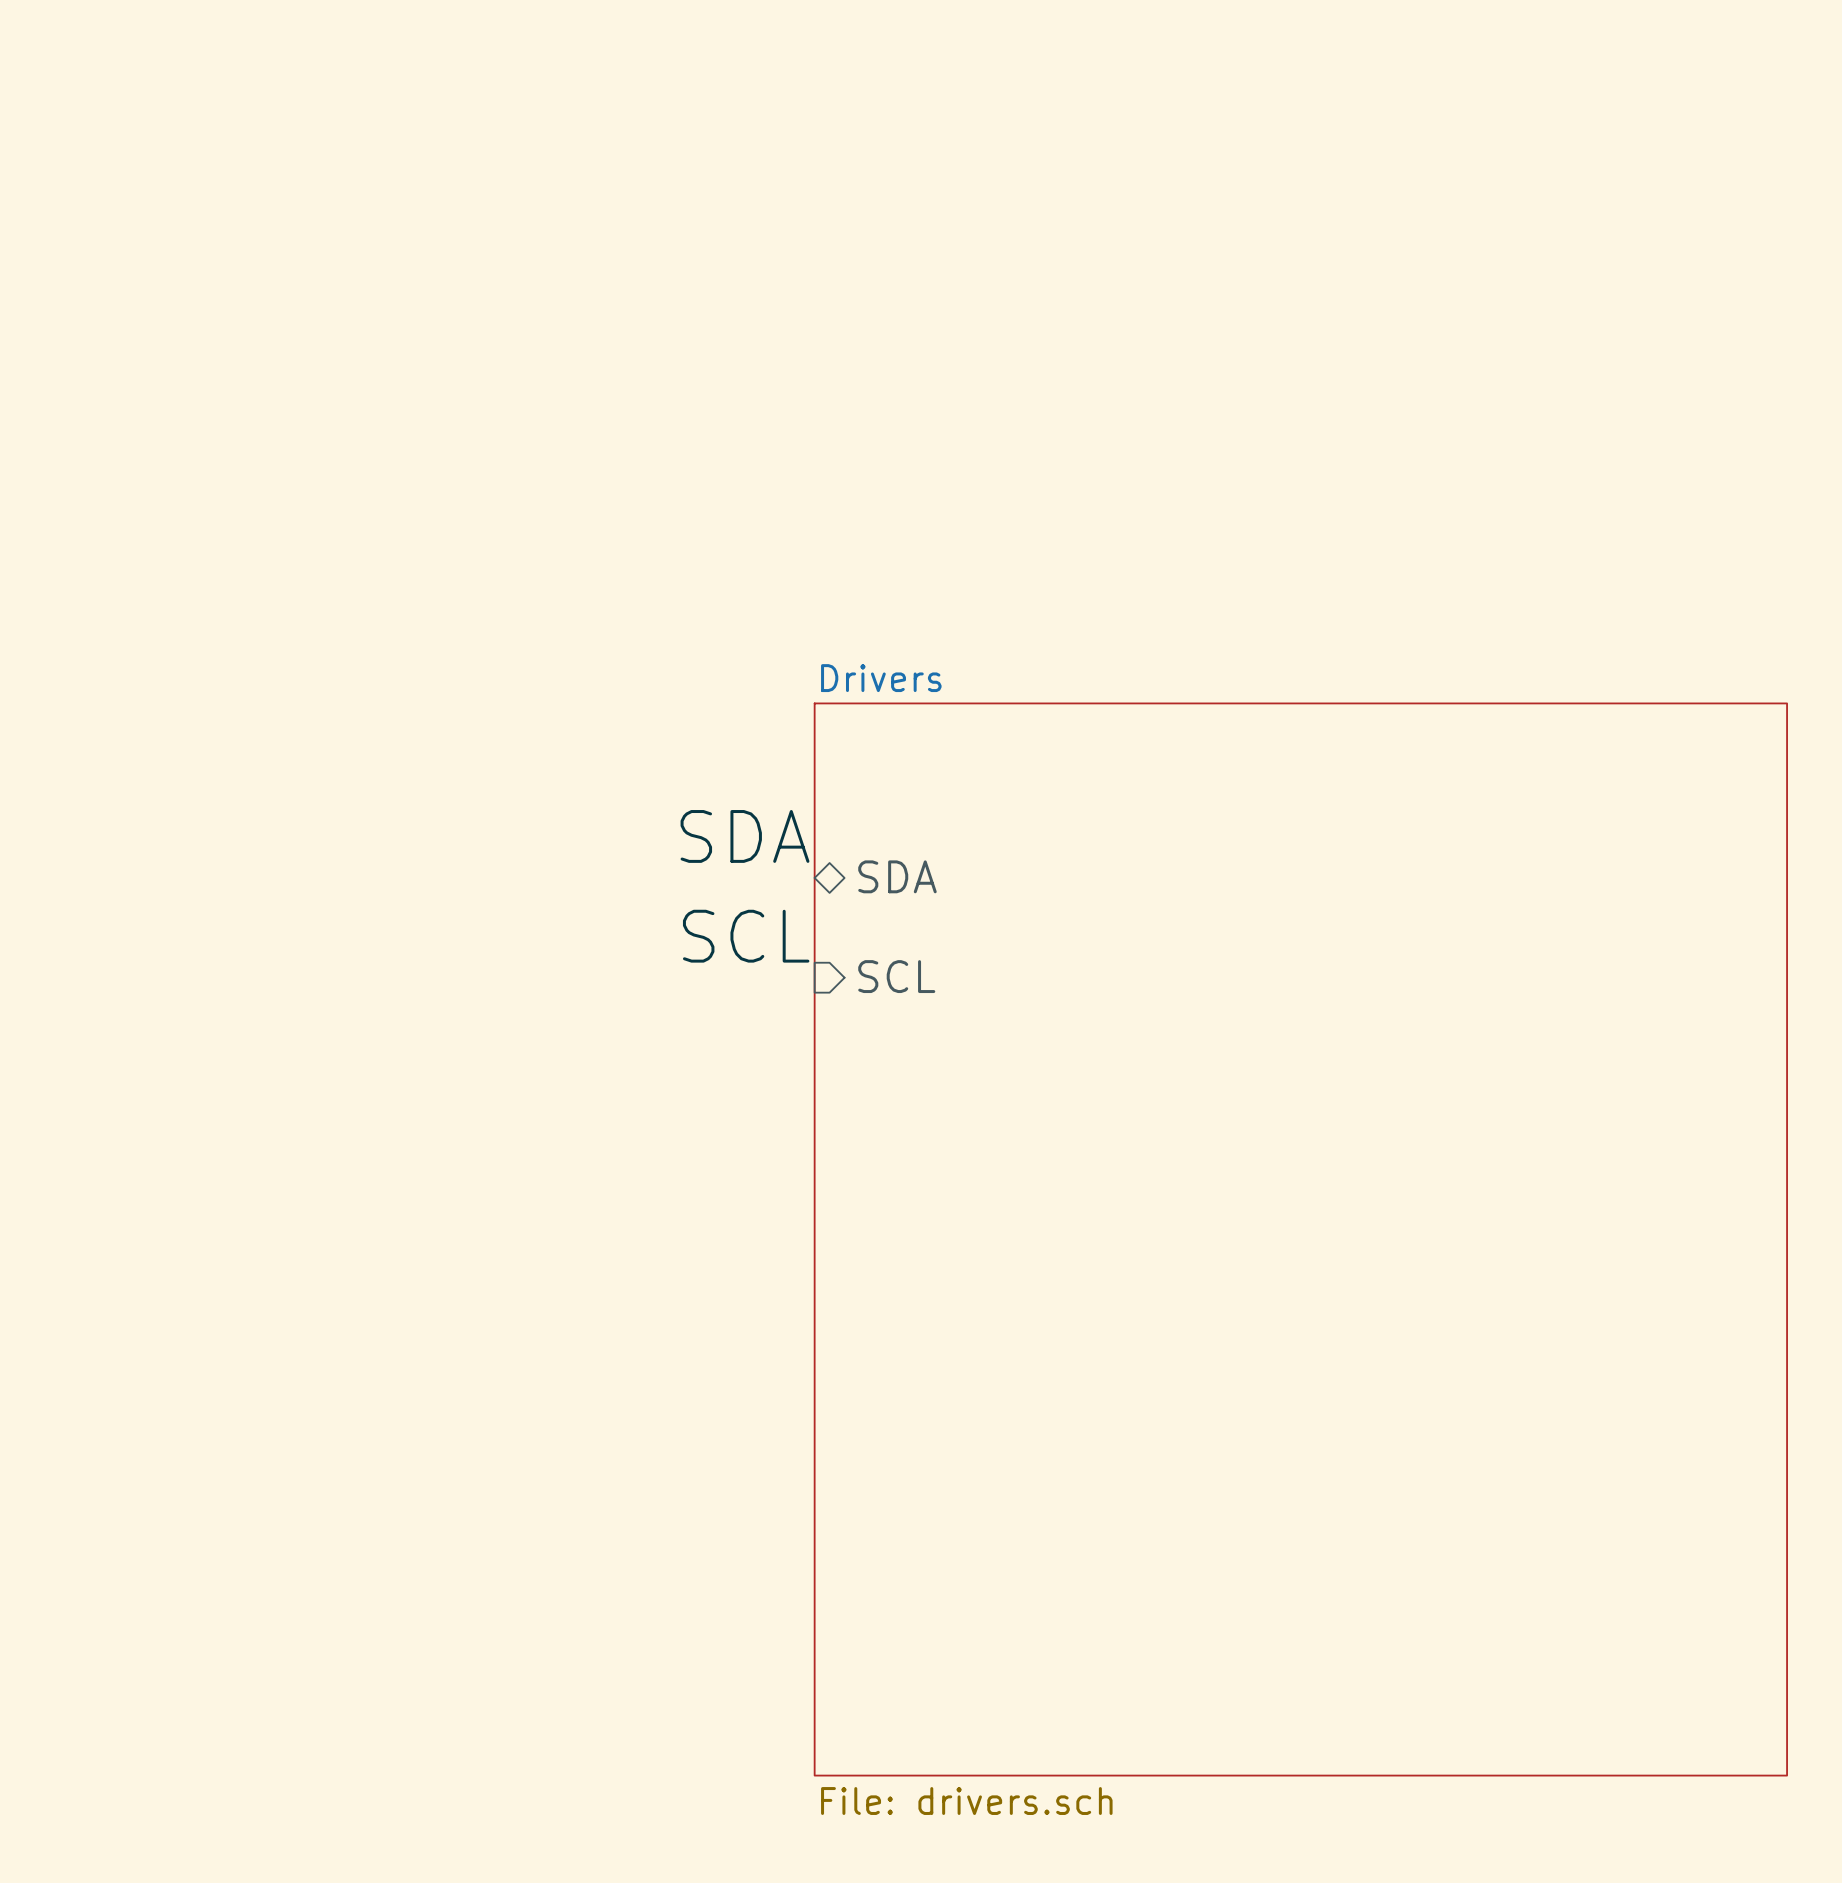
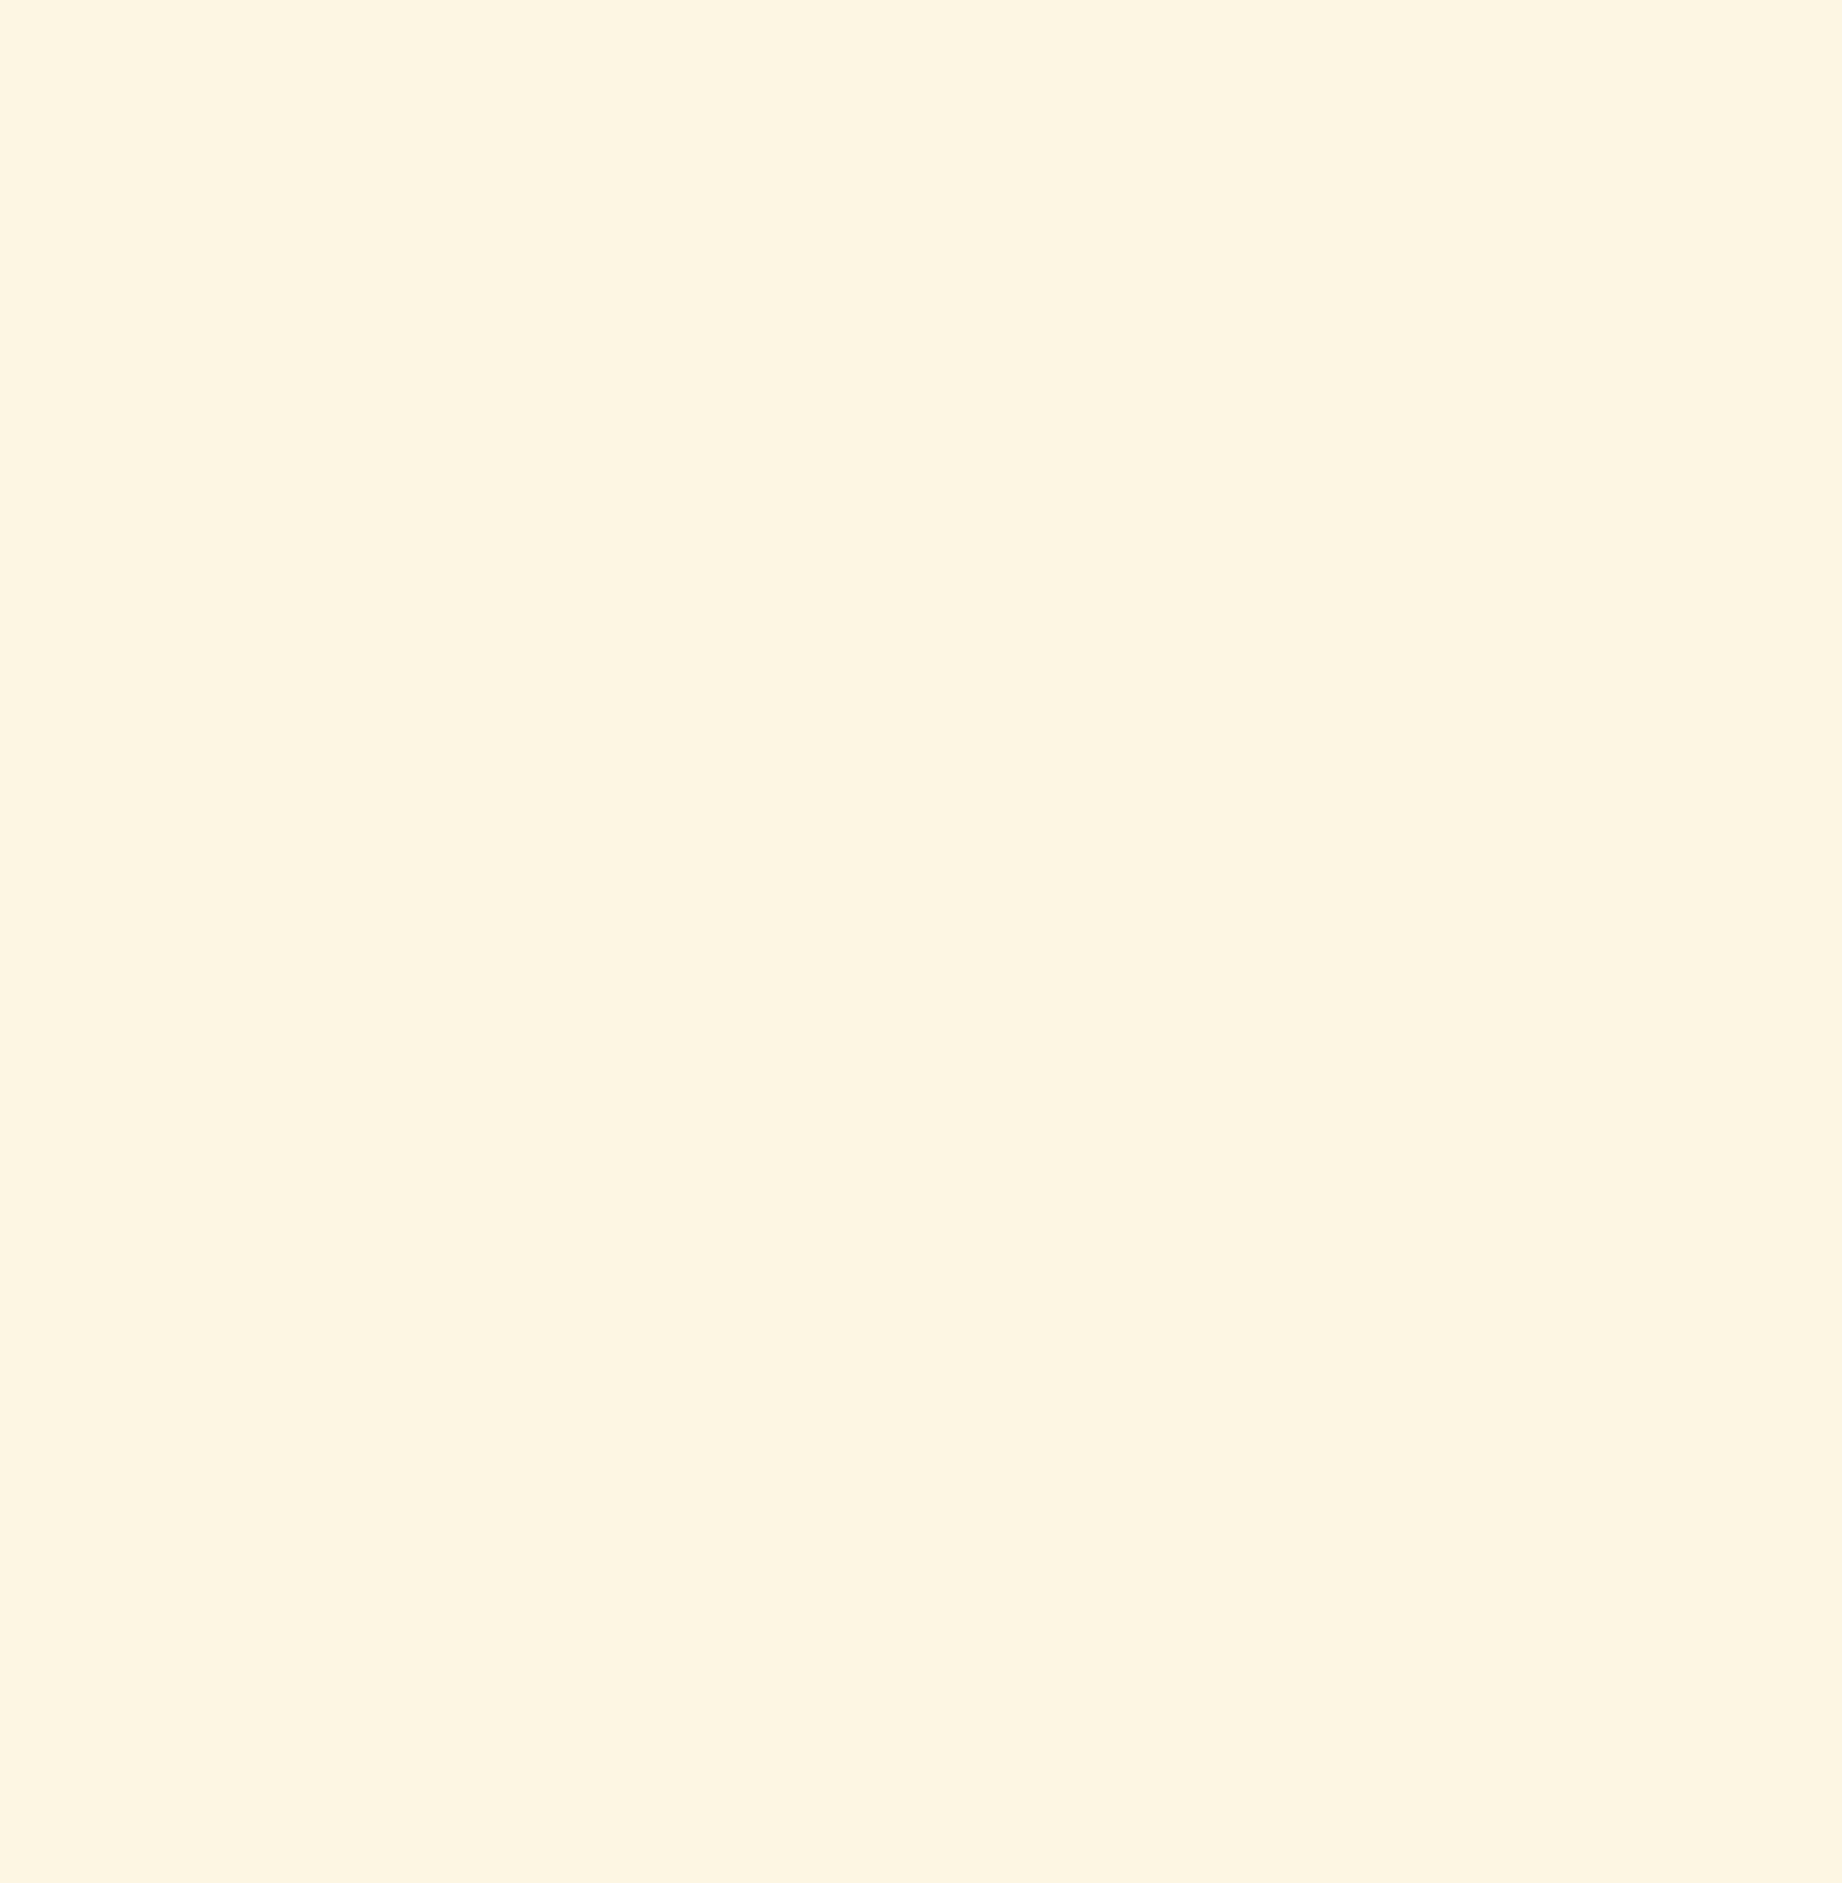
label: SDA (745, 836) -> none
sheet pin: SDA (897, 876) -> none
label: SCL (746, 936) -> none
sheet pin: SCL (896, 976) -> none
sheet Drivers: File: drivers.sch (1300, 1239) -> none

